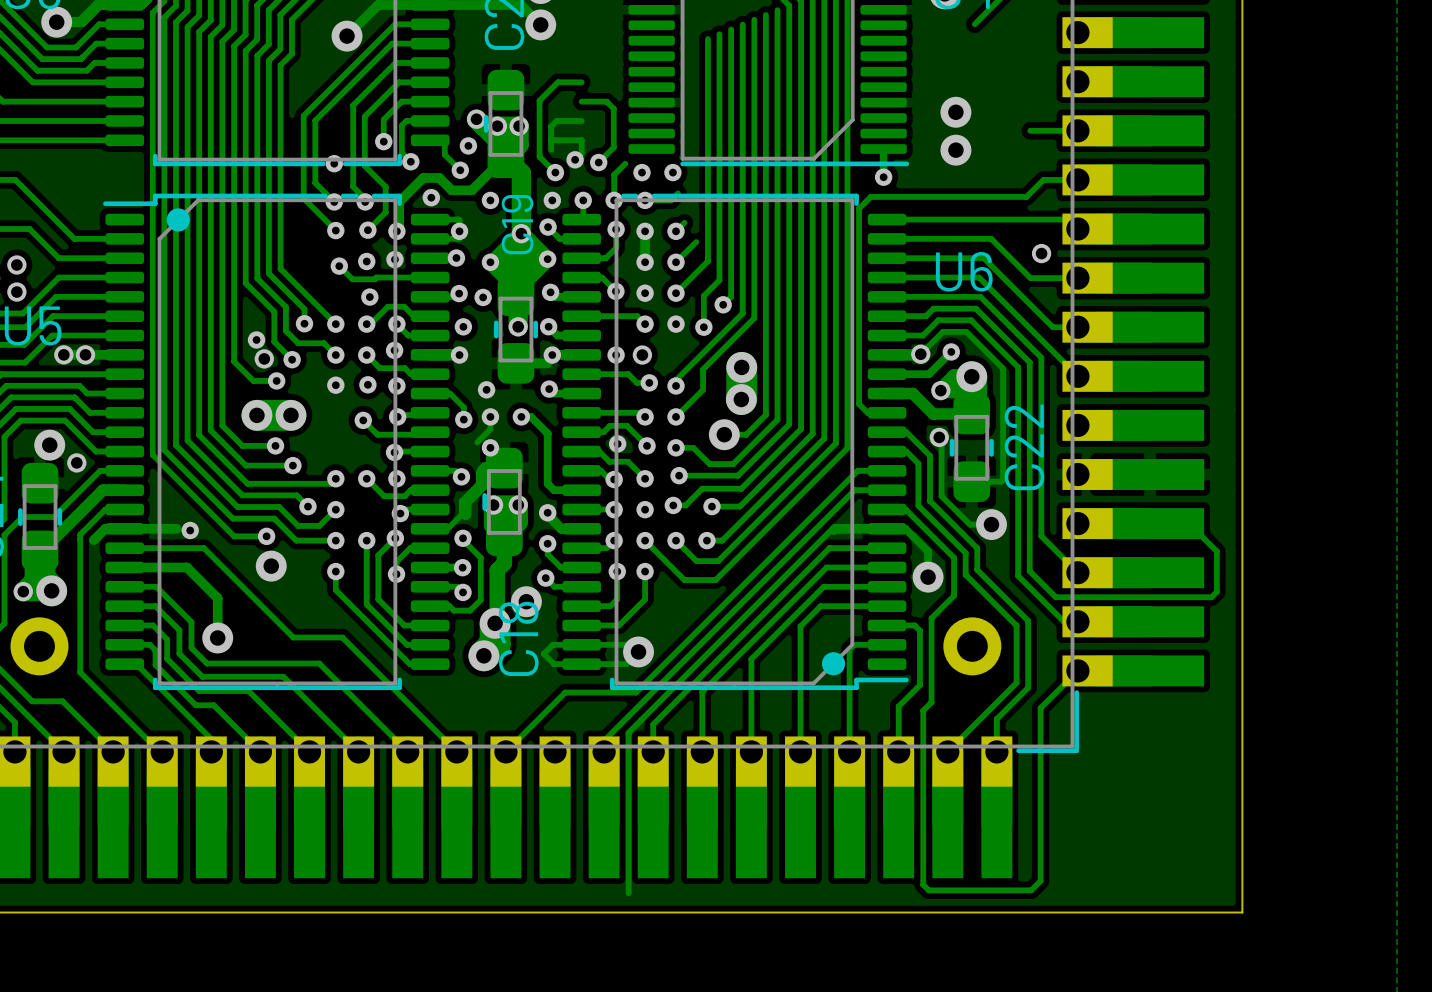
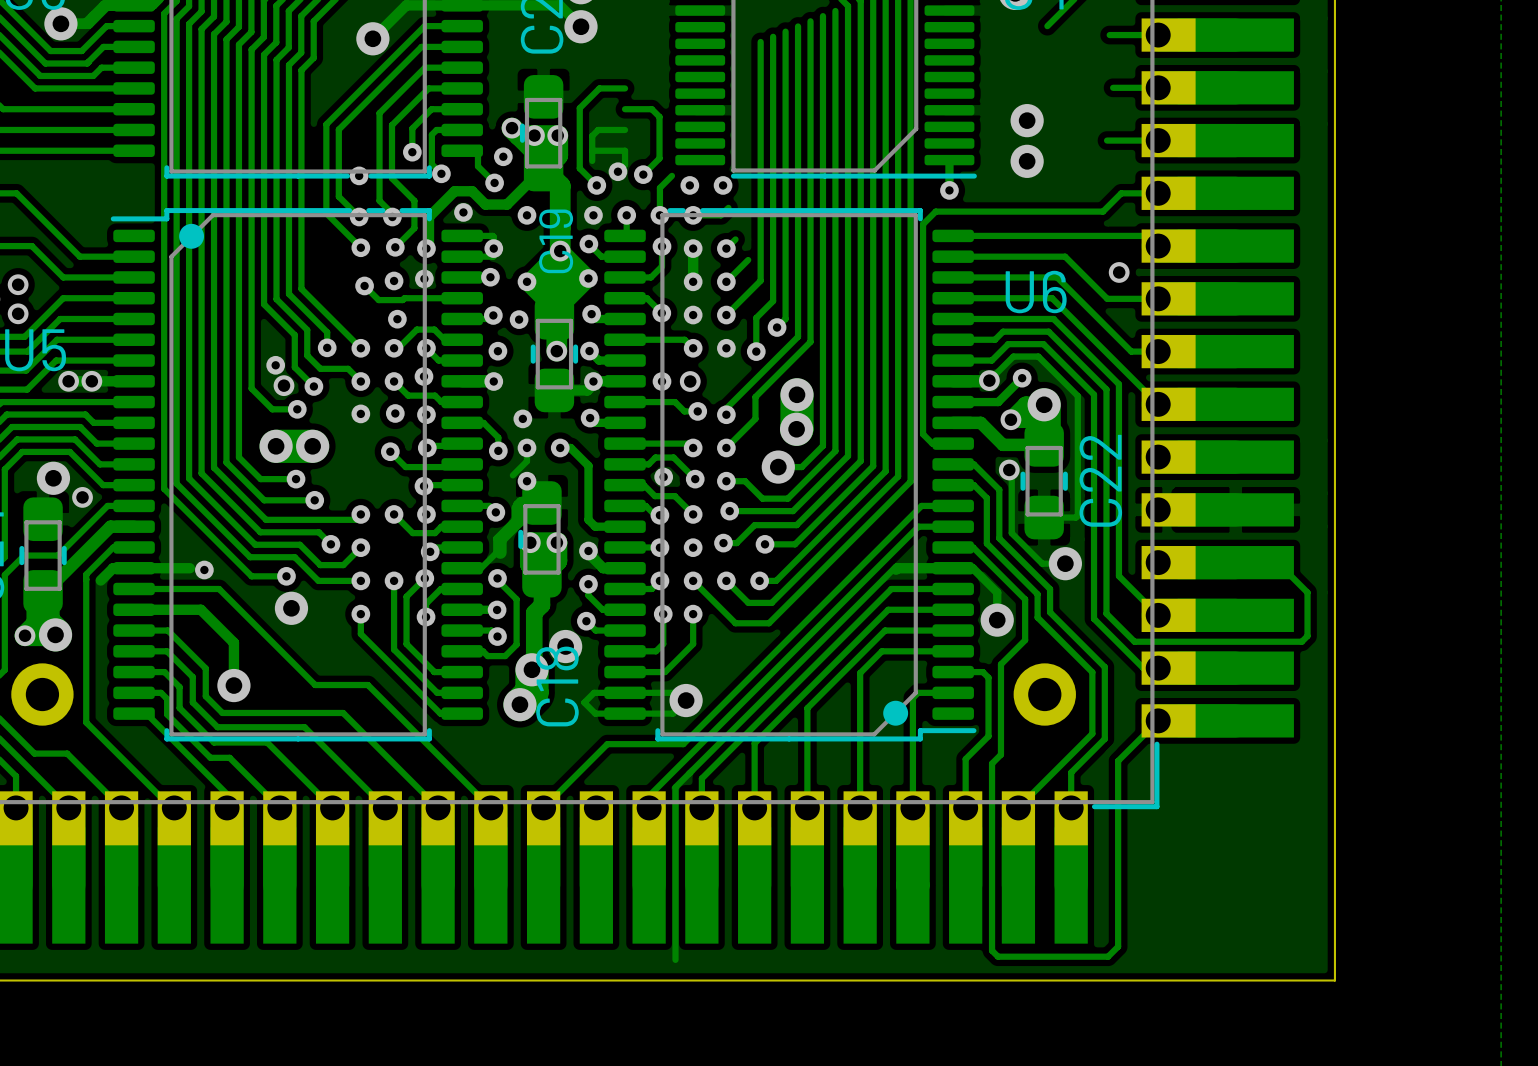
track: none -> (1158, 35) (1109, 35)
track: none -> (1158, 87) (1113, 87)

